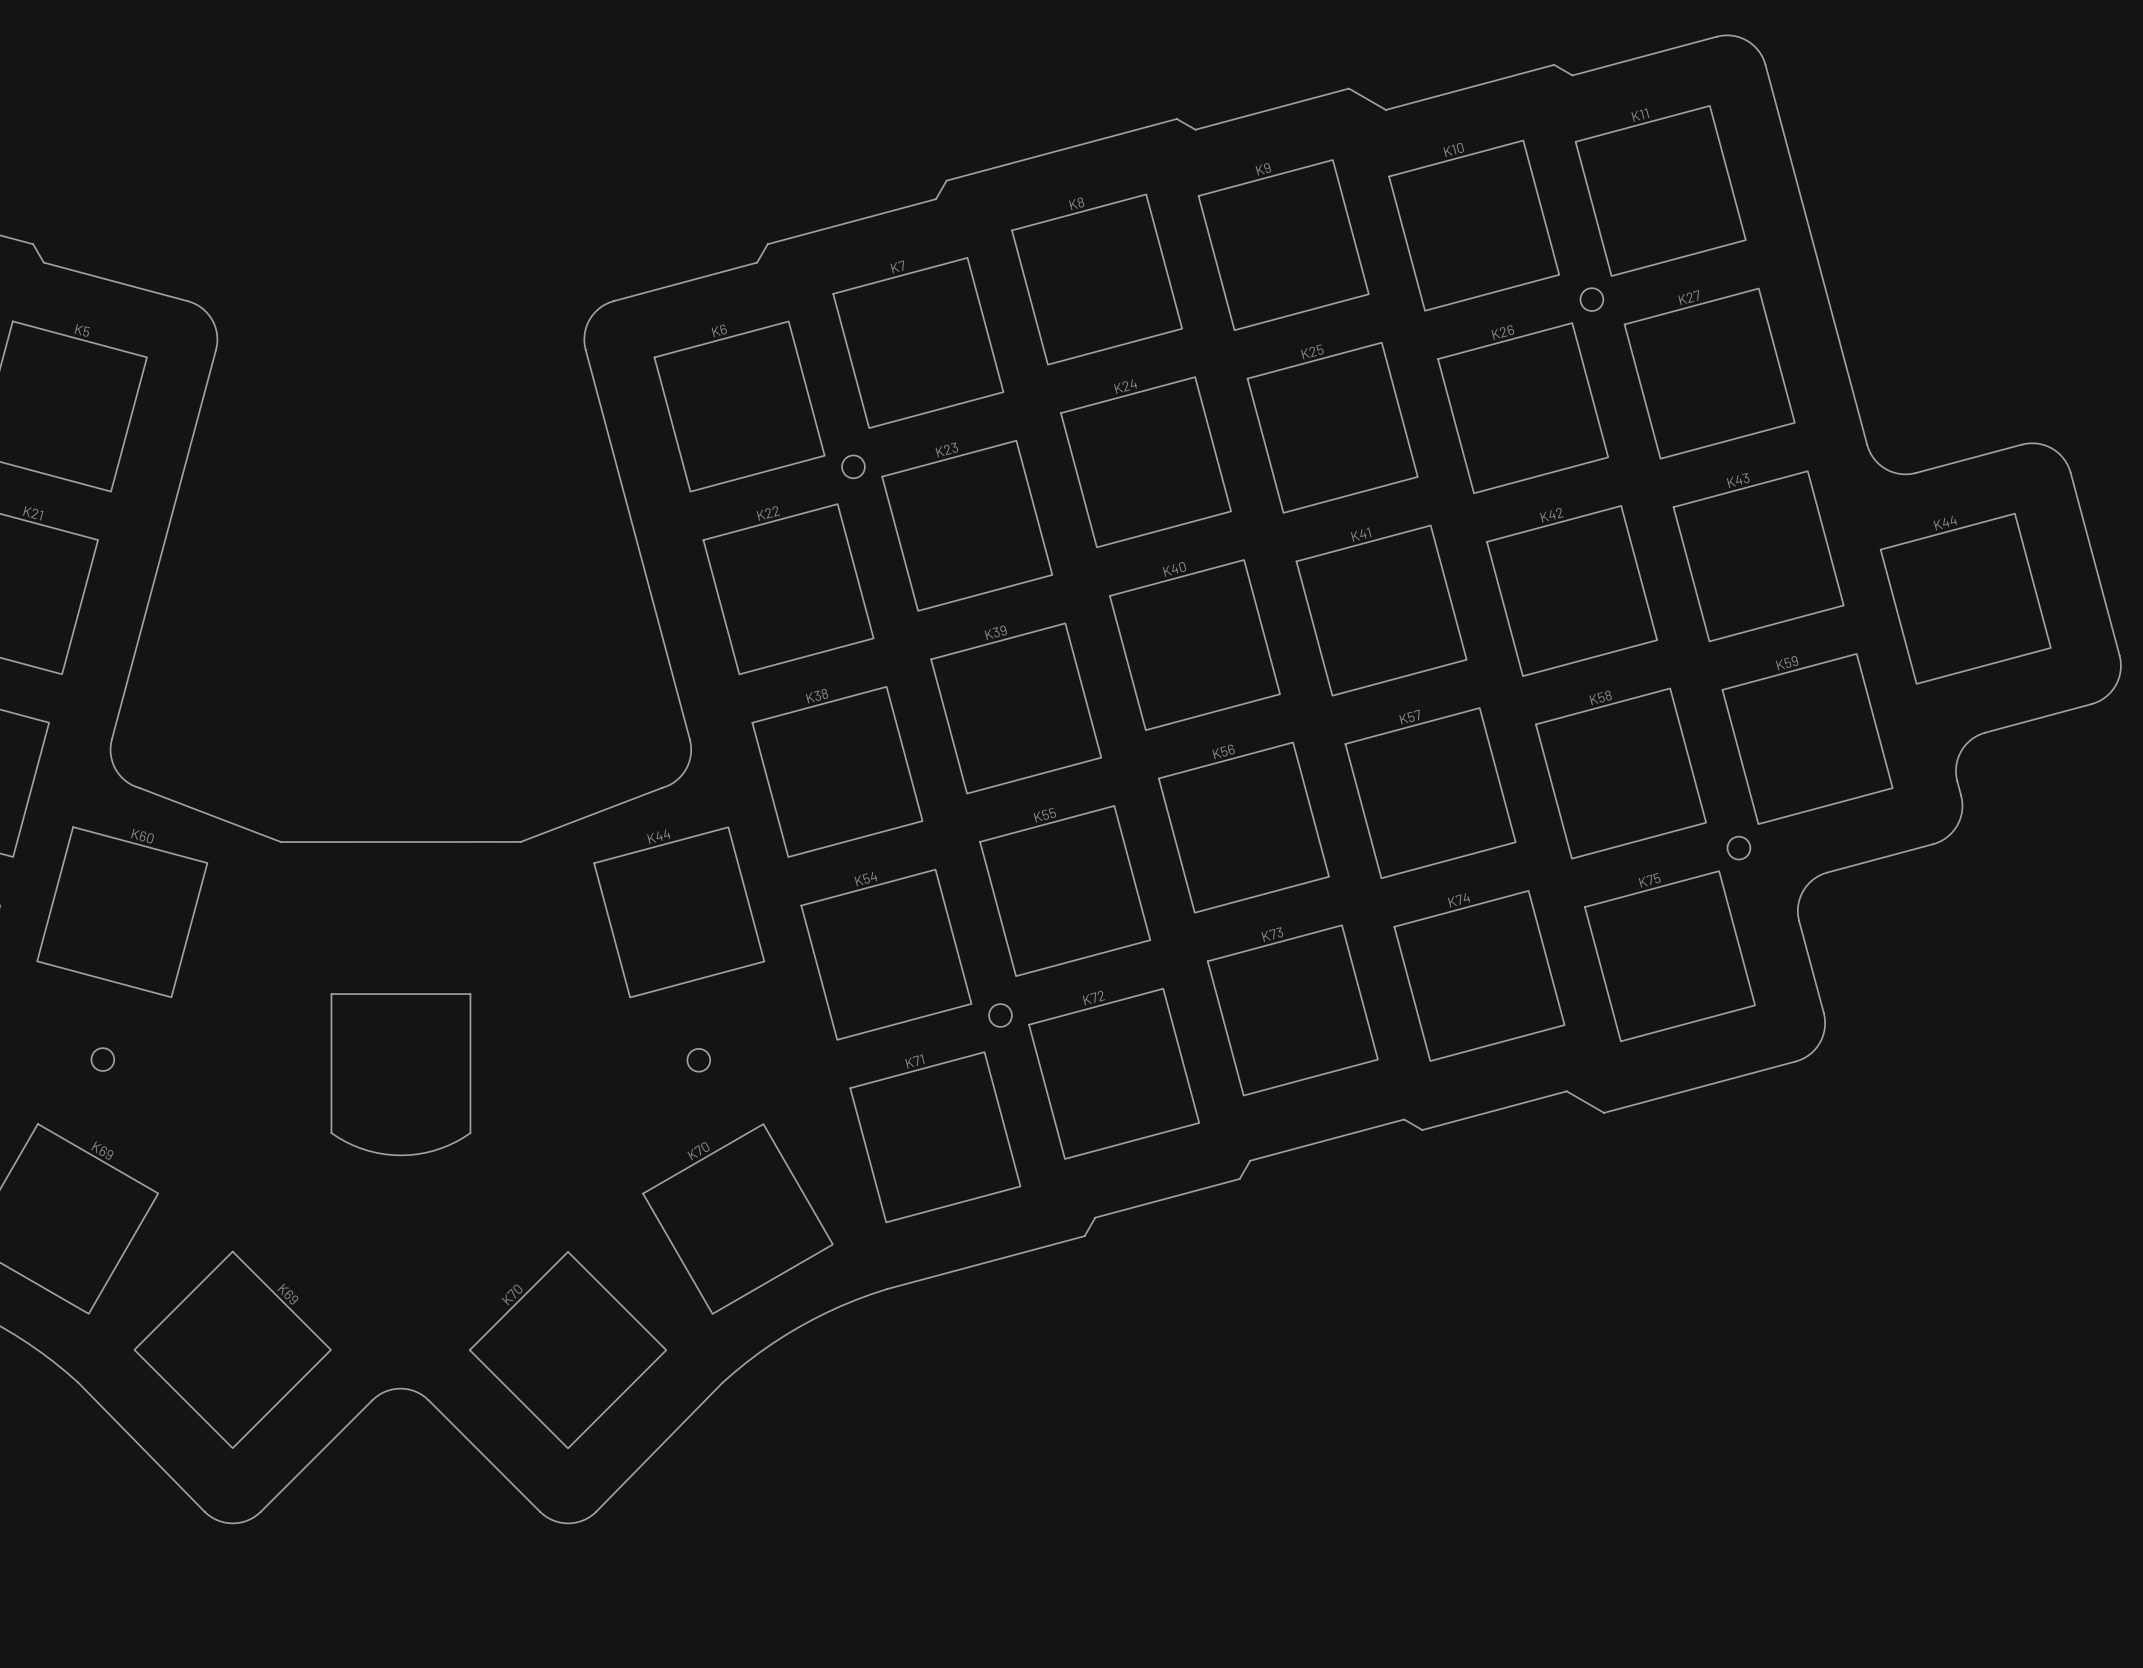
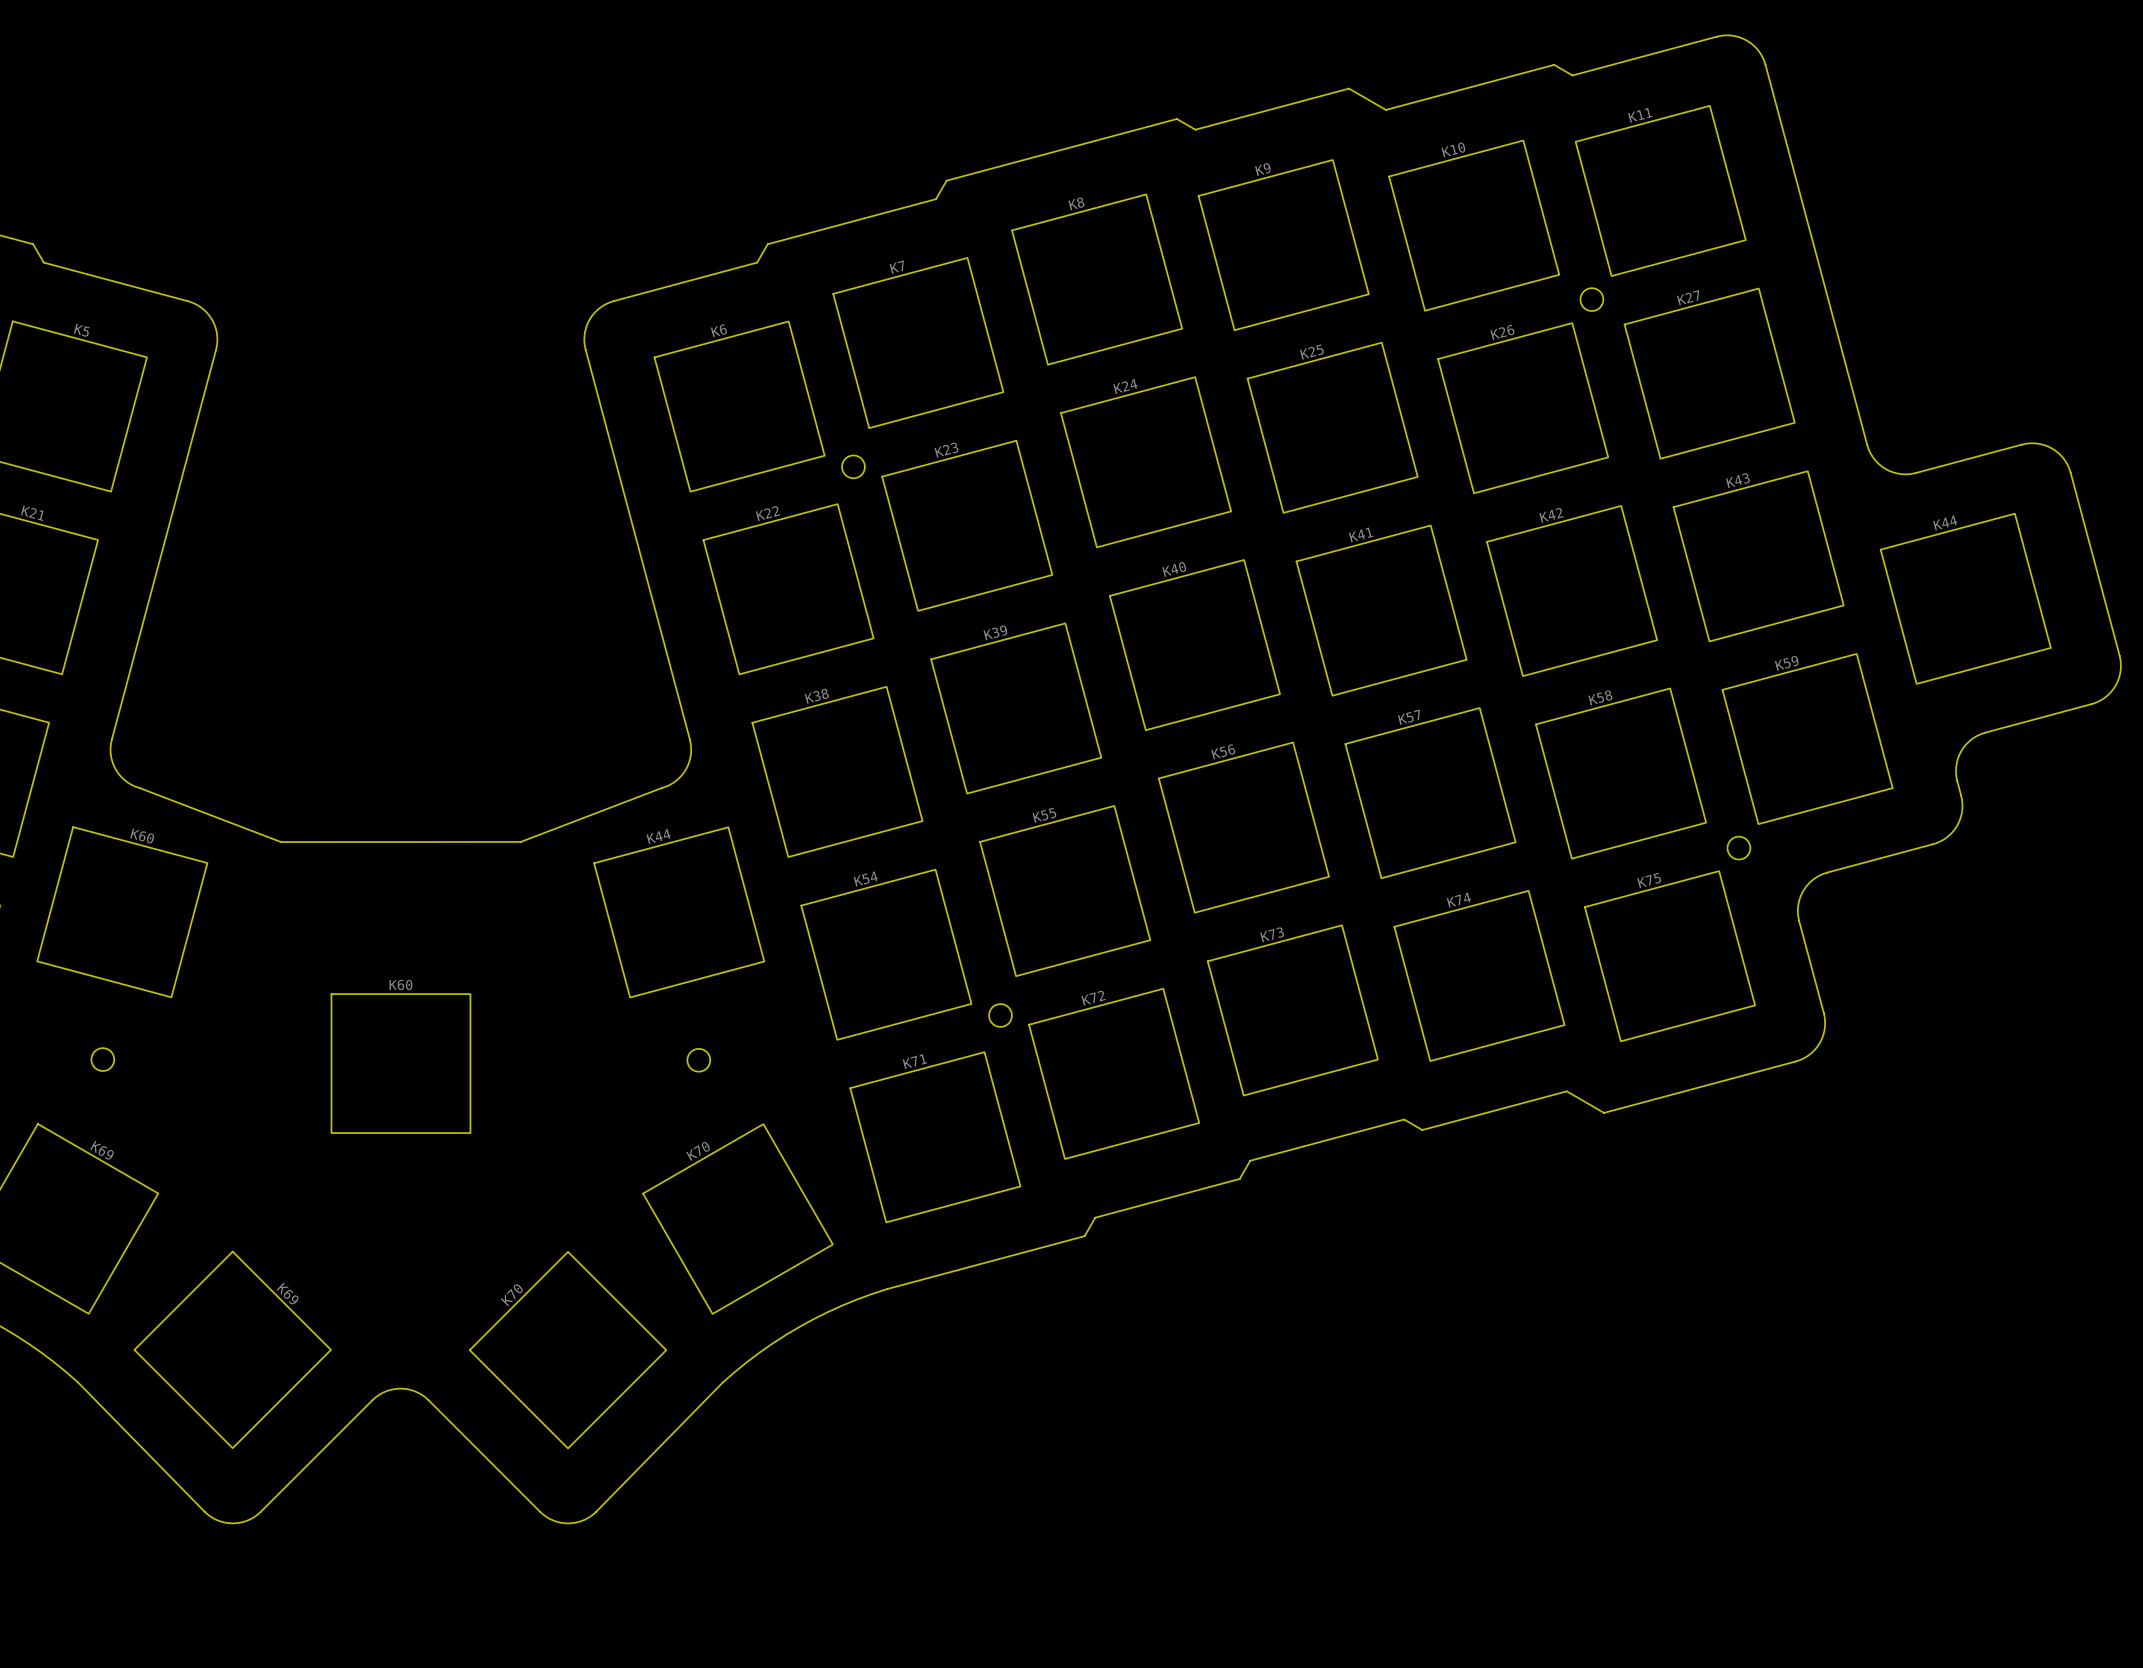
board edge: (331, 994) (470, 994) (470, 1133) (441, 1148) (417, 1154) (400, 1155) (384, 1154) (360, 1148) (331, 1133) (331, 994) -> none
K60: none -> (400, 1063)

